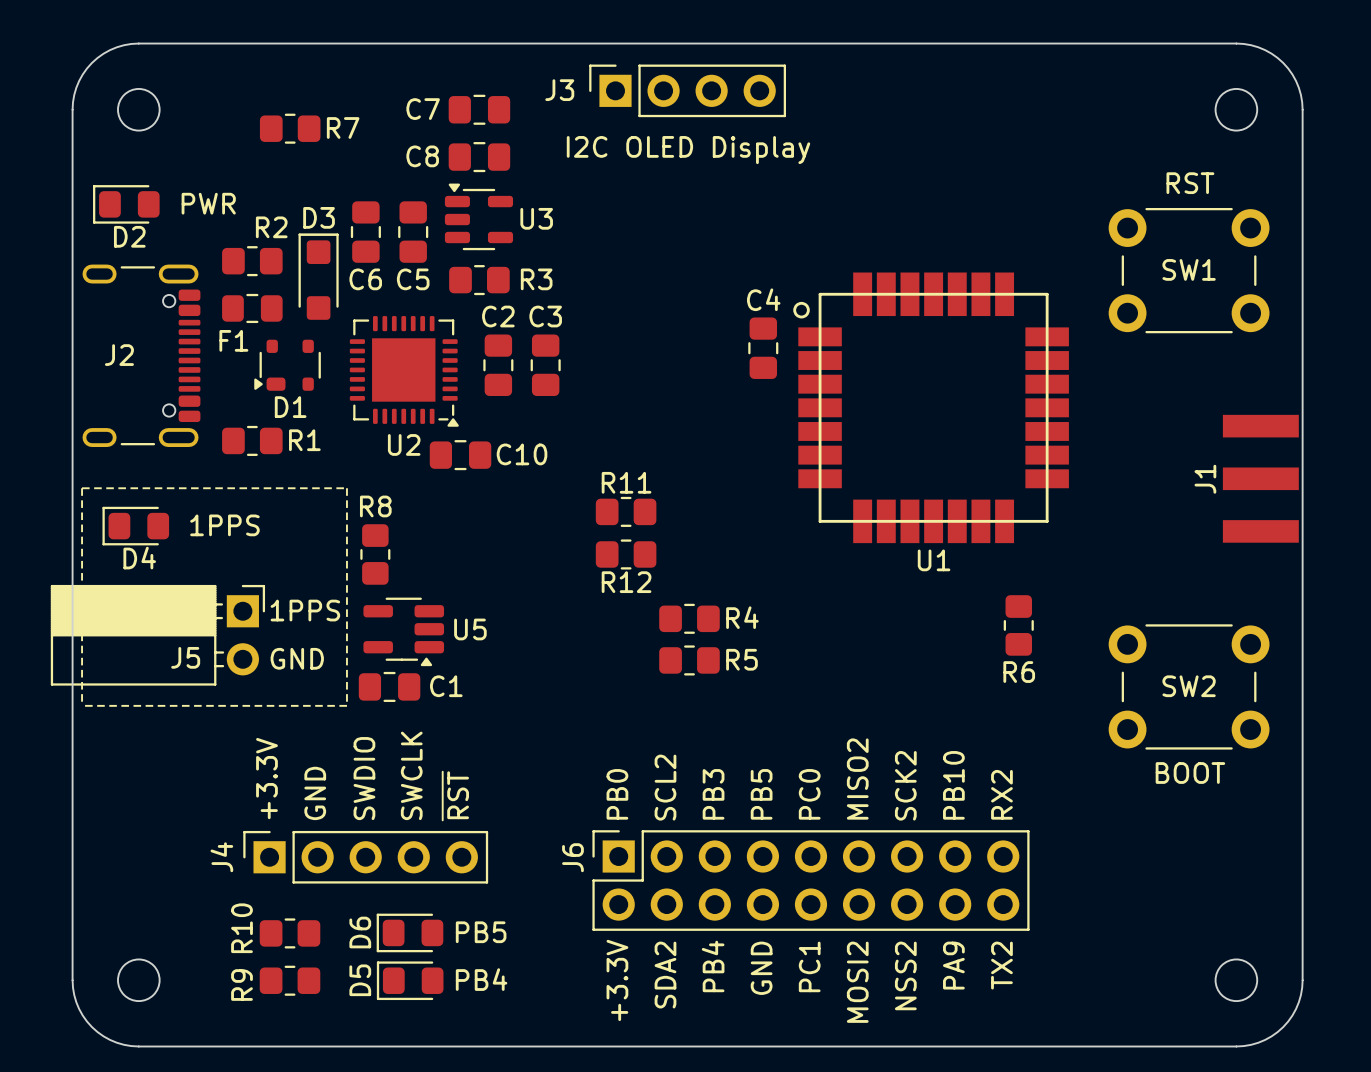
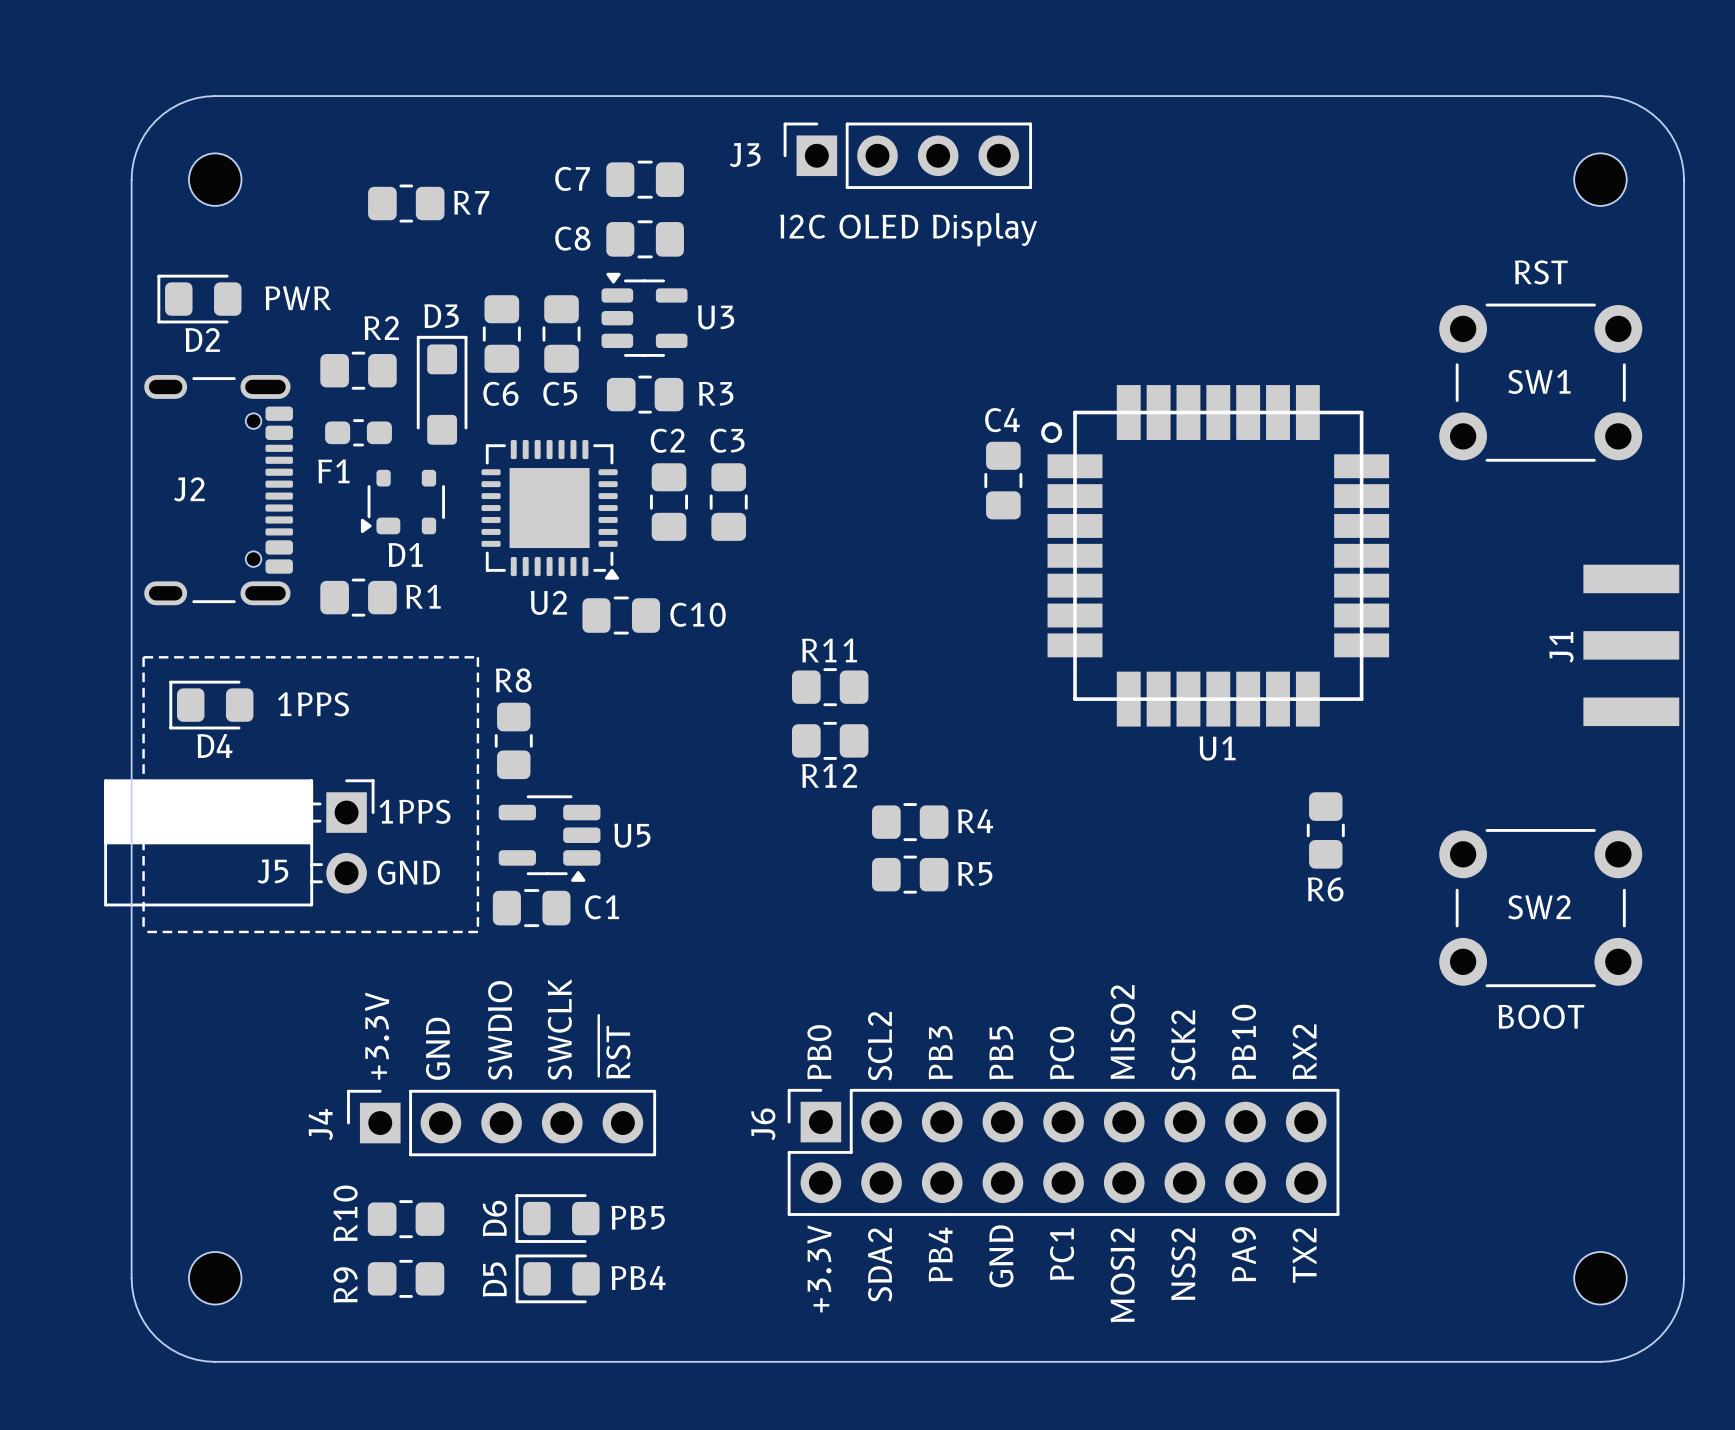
F1 footprint: [222, 293, 283, 324] -> [325, 419, 392, 447]

